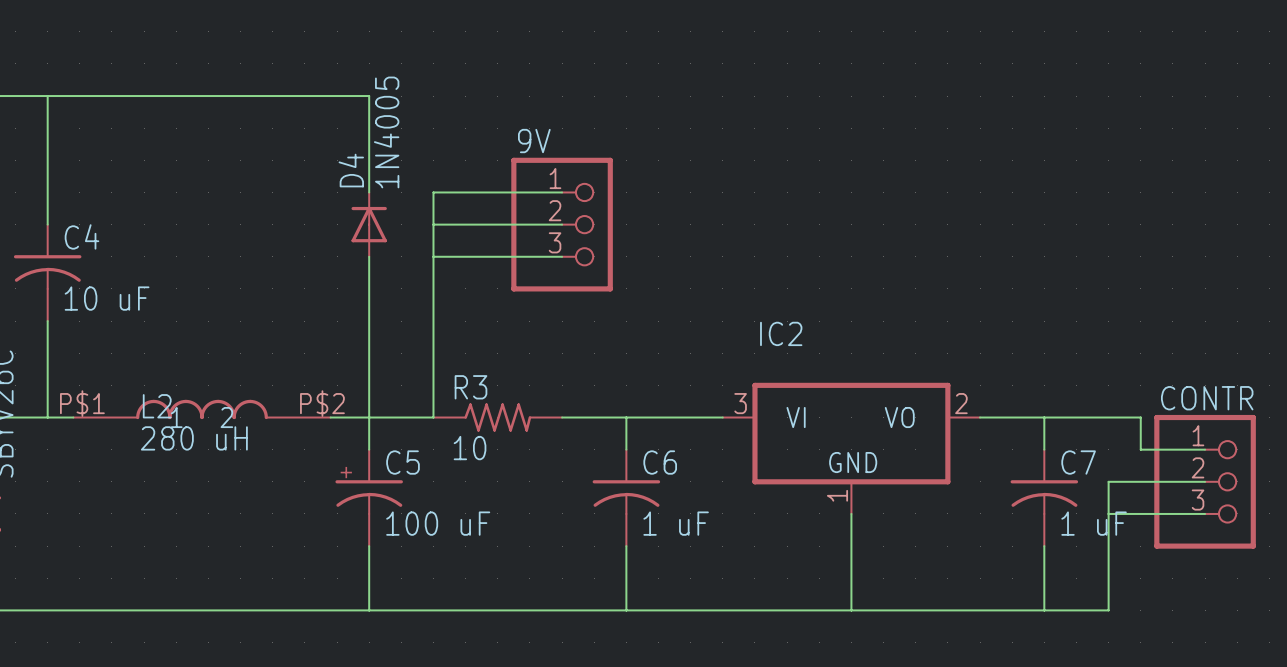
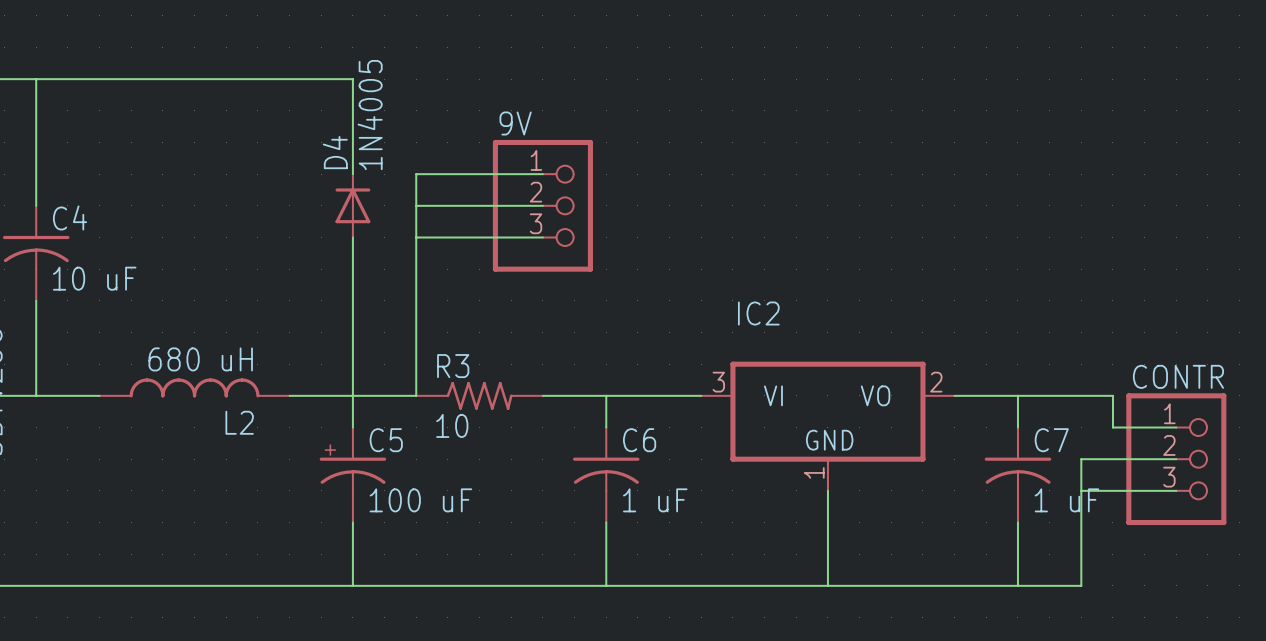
L2 symbol: [73, 399, 331, 420] -> [99, 378, 290, 398]
L2 name position: L2 (157, 406) -> L2 (239, 422)
L2 value: 280 uH (194, 438) -> 680 uH (200, 359)

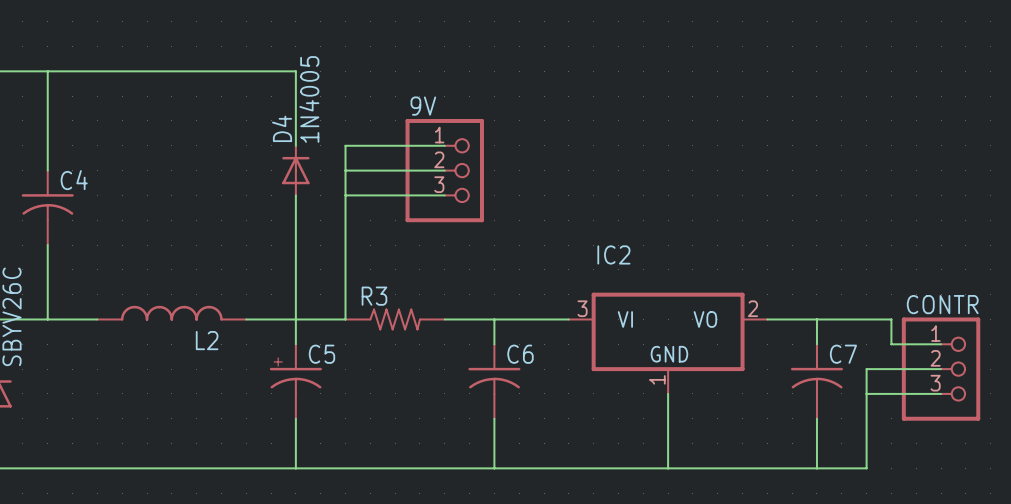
C4 value: 10 uF (94, 278) -> none
L2 value: 680 uH (200, 359) -> none
R3 value: 10 (452, 425) -> none
C5 value: 100 uF (420, 500) -> none
C6 value: 1 uF (655, 500) -> none
C7 value: 1 uF (1066, 500) -> none

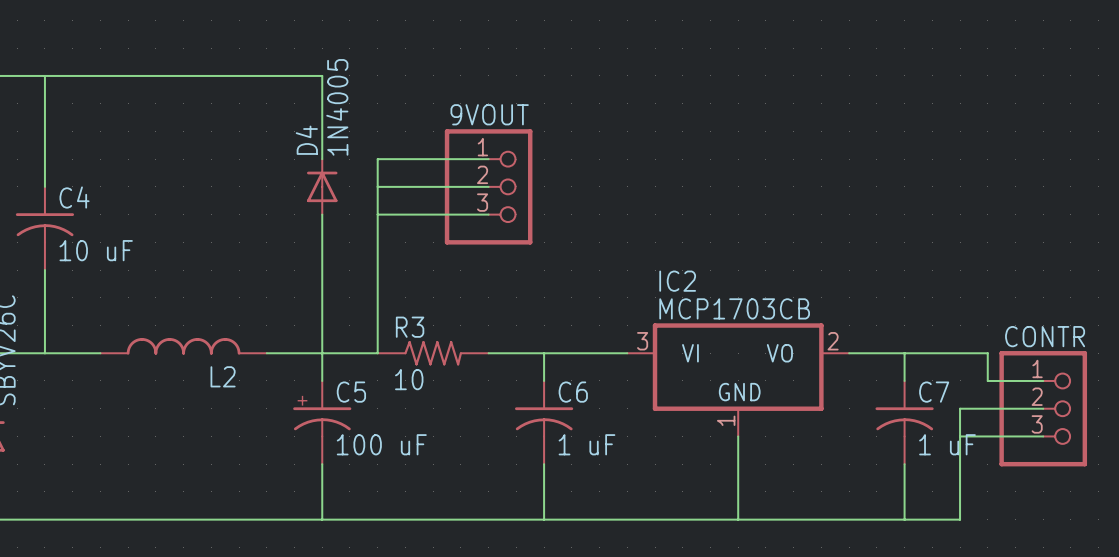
9V name: 9V (423, 106) -> 9VOUT (489, 114)
C4 value: none -> 10 uF (96, 250)
IC2 value: none -> MCP1703CB (734, 308)
R3 value: none -> 10 (409, 379)
C5 value: none -> 100 uF (381, 444)
C6 value: none -> 1 uF (586, 444)
C7 value: none -> 1 uF (947, 444)

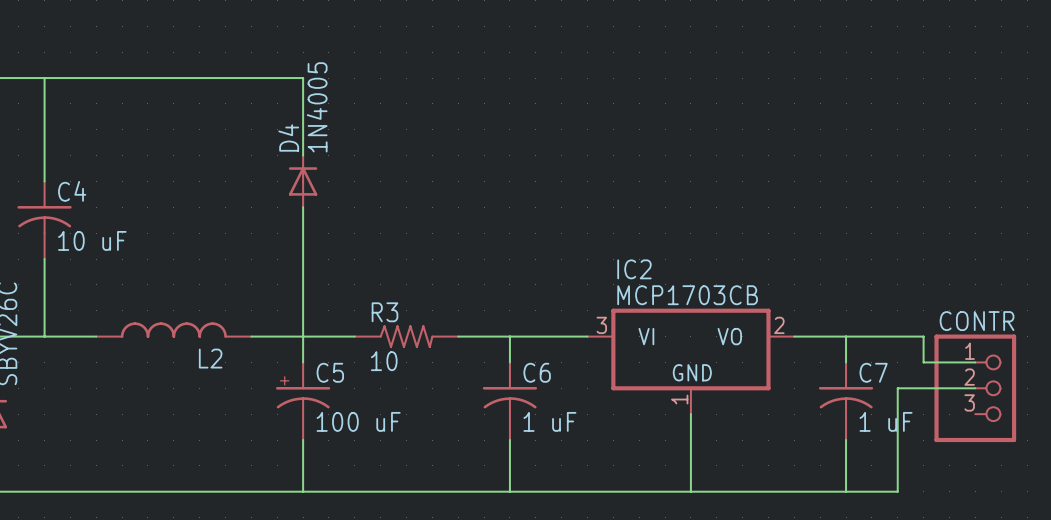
wire: (488, 159) (377, 159) (377, 353) -> none
wire: (377, 186) (488, 186) -> none
9VOUT: (488, 186) -> none
wire: (377, 214) (488, 214) -> none
wire: (960, 436) (1043, 436) -> none

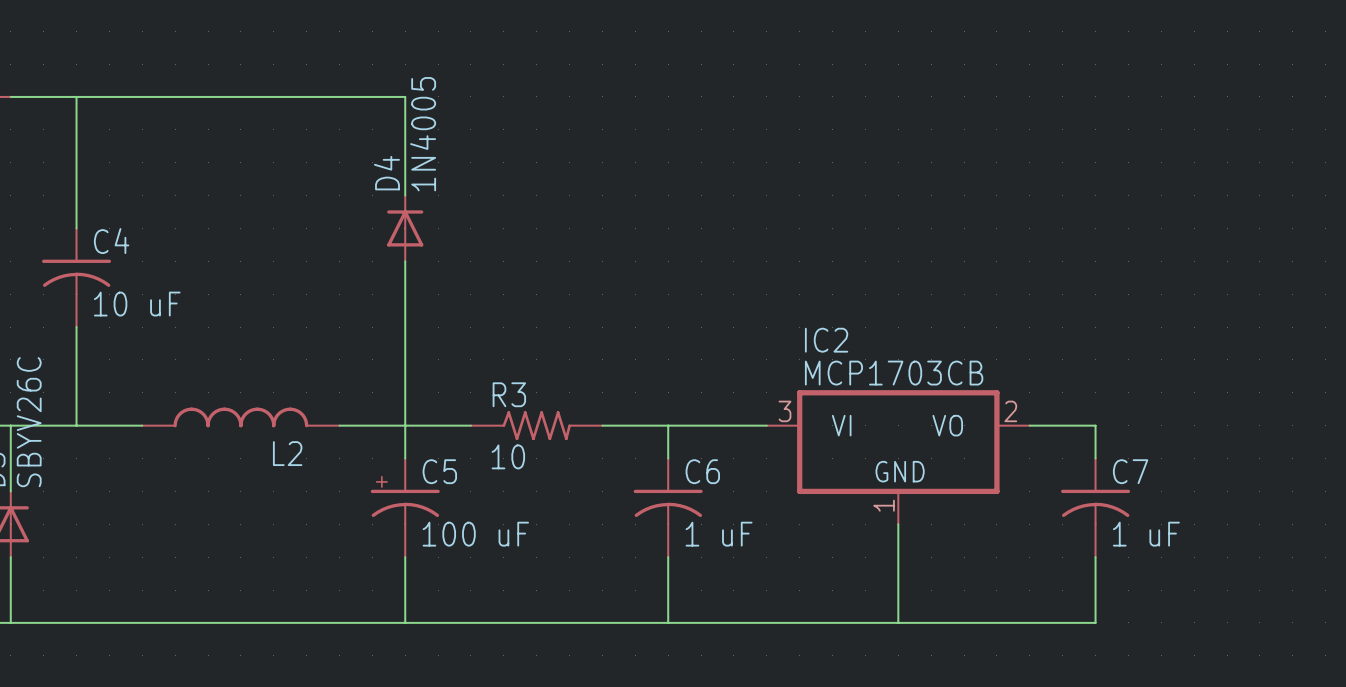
wire: (846, 336) (923, 336) (923, 362) (975, 362) -> none
wire: (975, 388) (897, 388) (897, 491) (846, 491) -> none
CONTR: (975, 388) -> none

